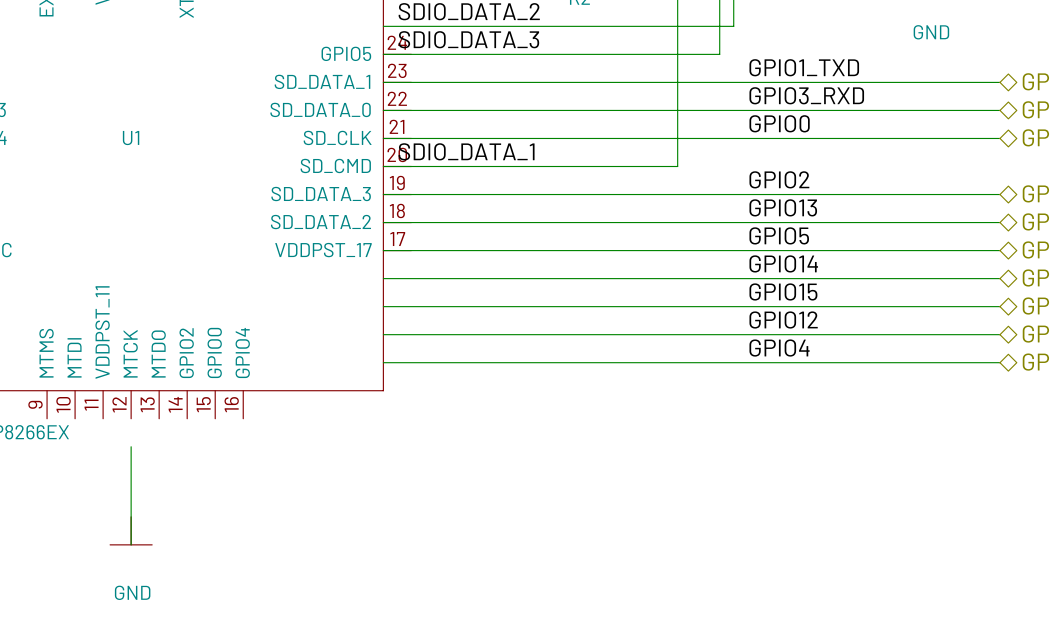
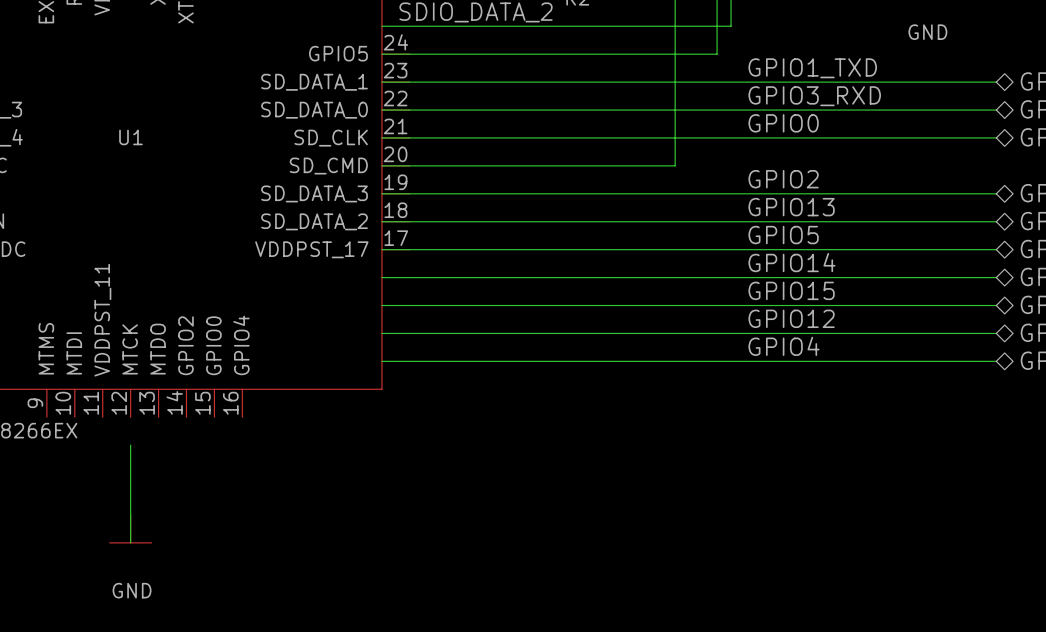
label: SDIO_DATA_3 (468, 39) -> none
label: SDIO_DATA_1 (466, 151) -> none

